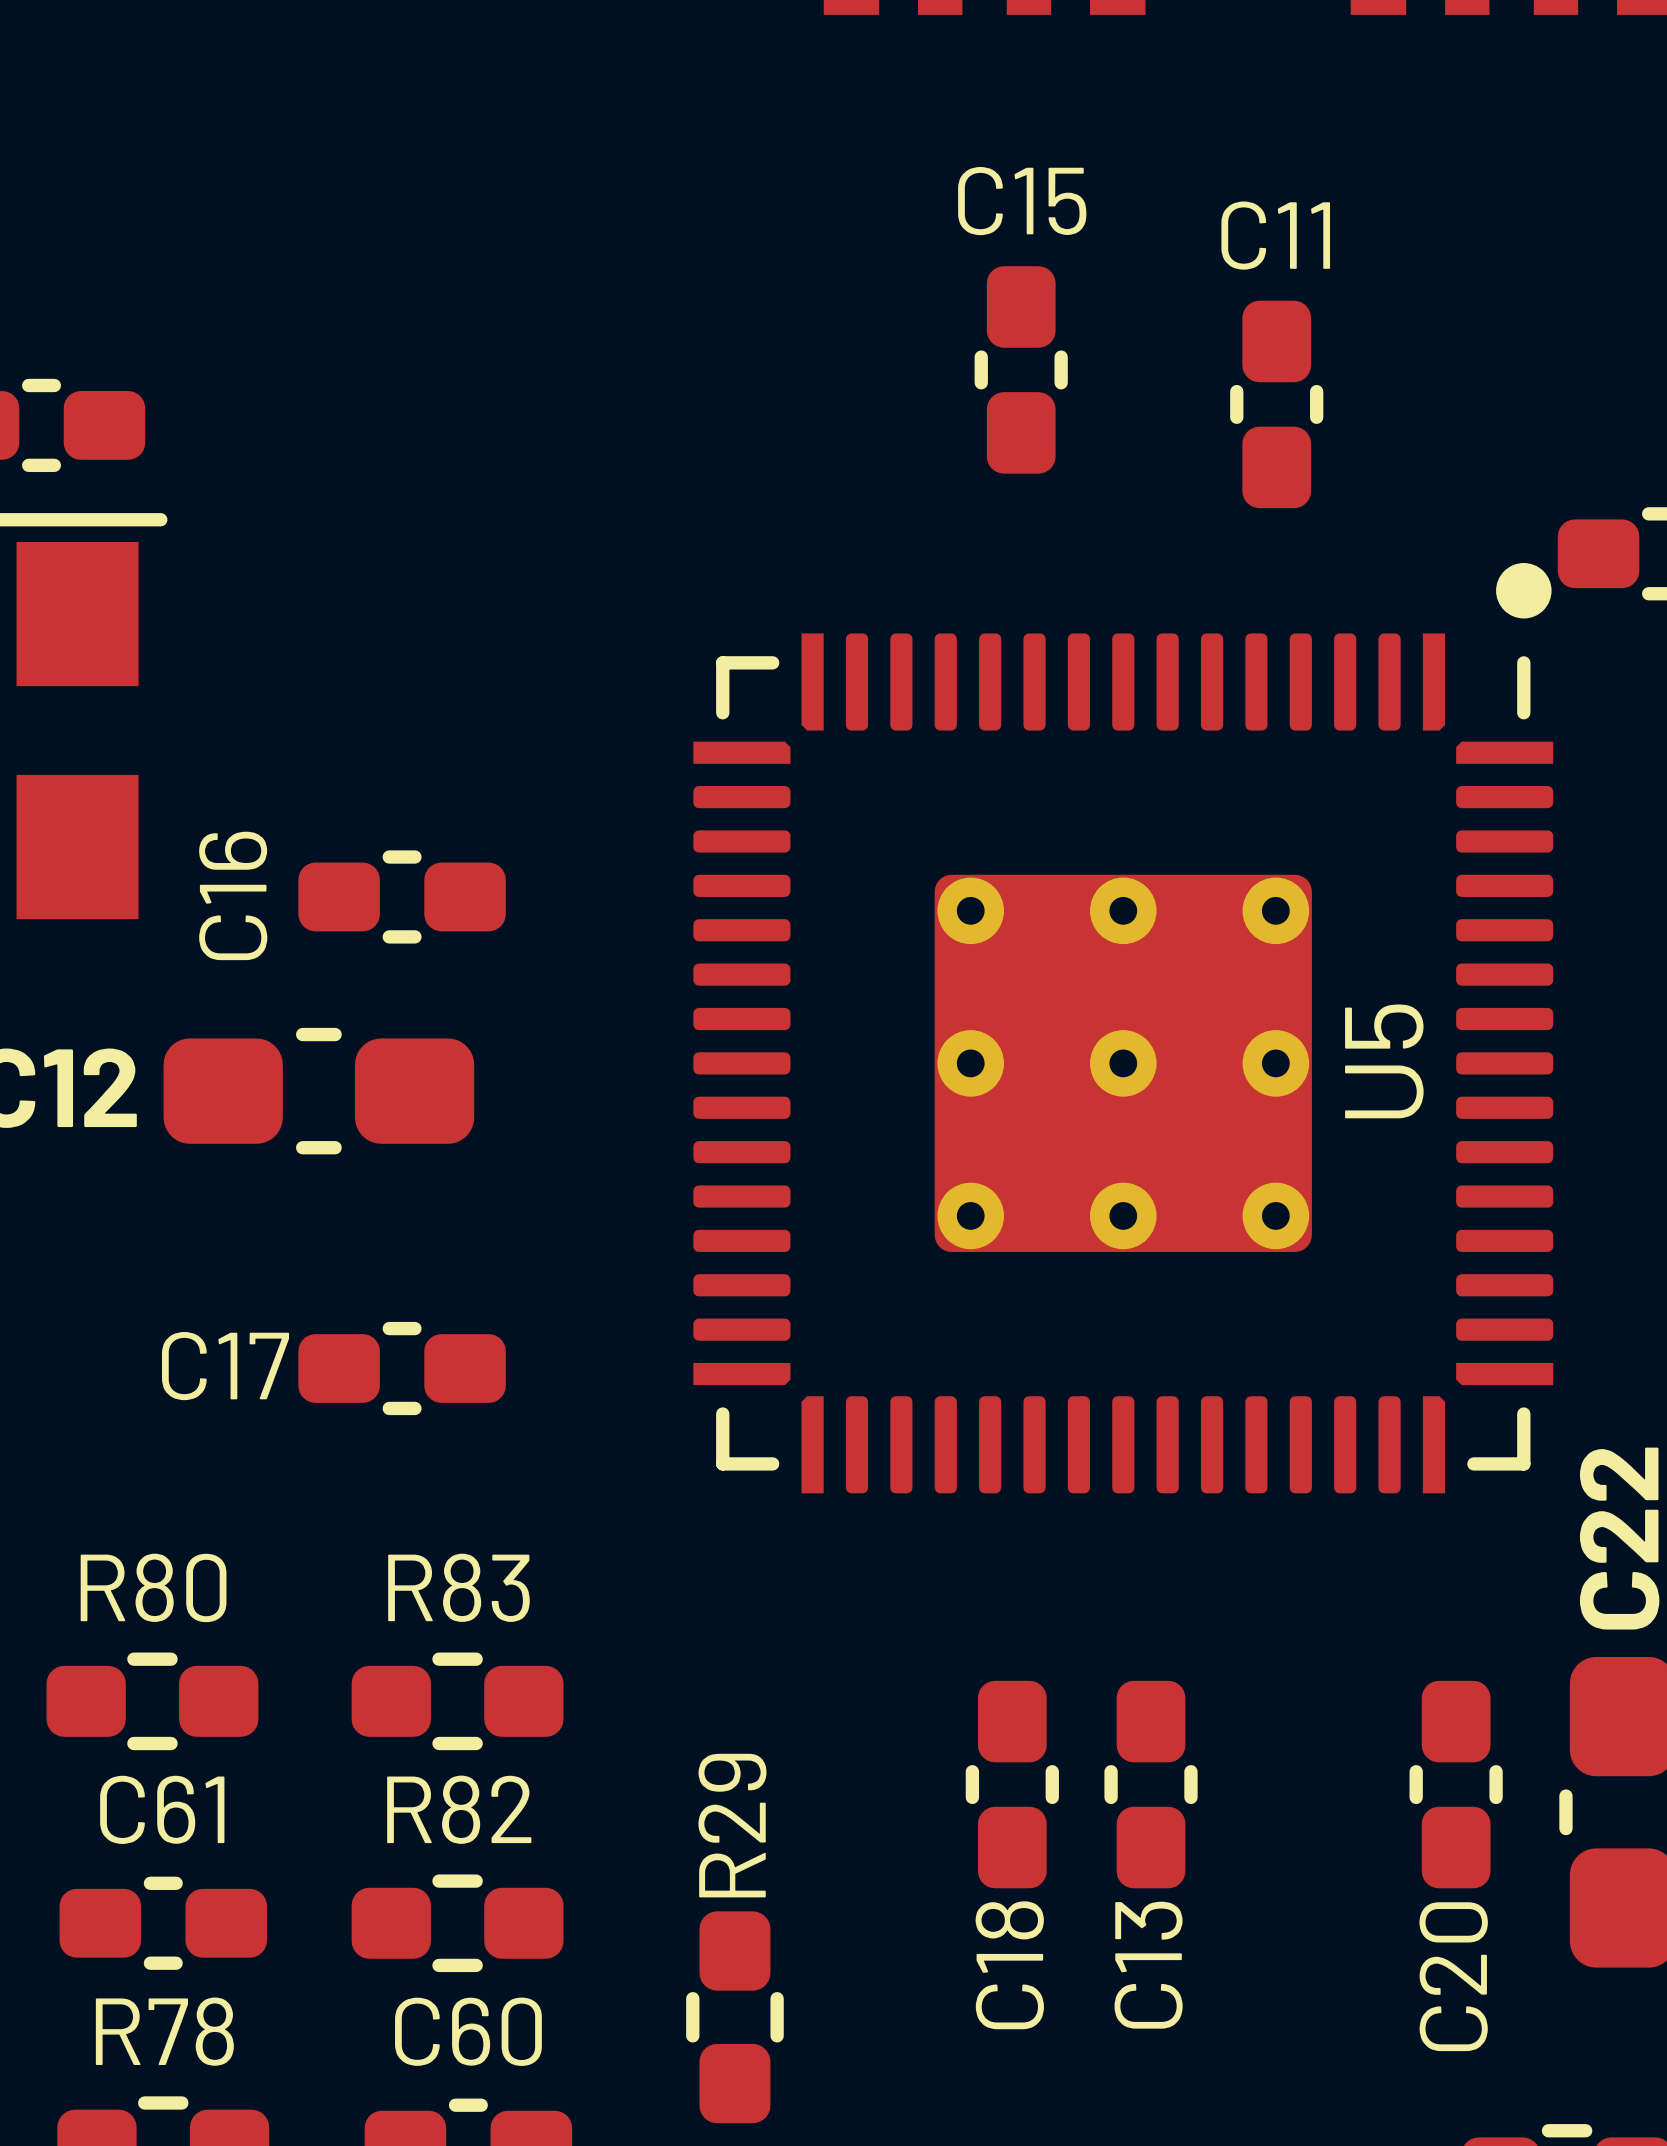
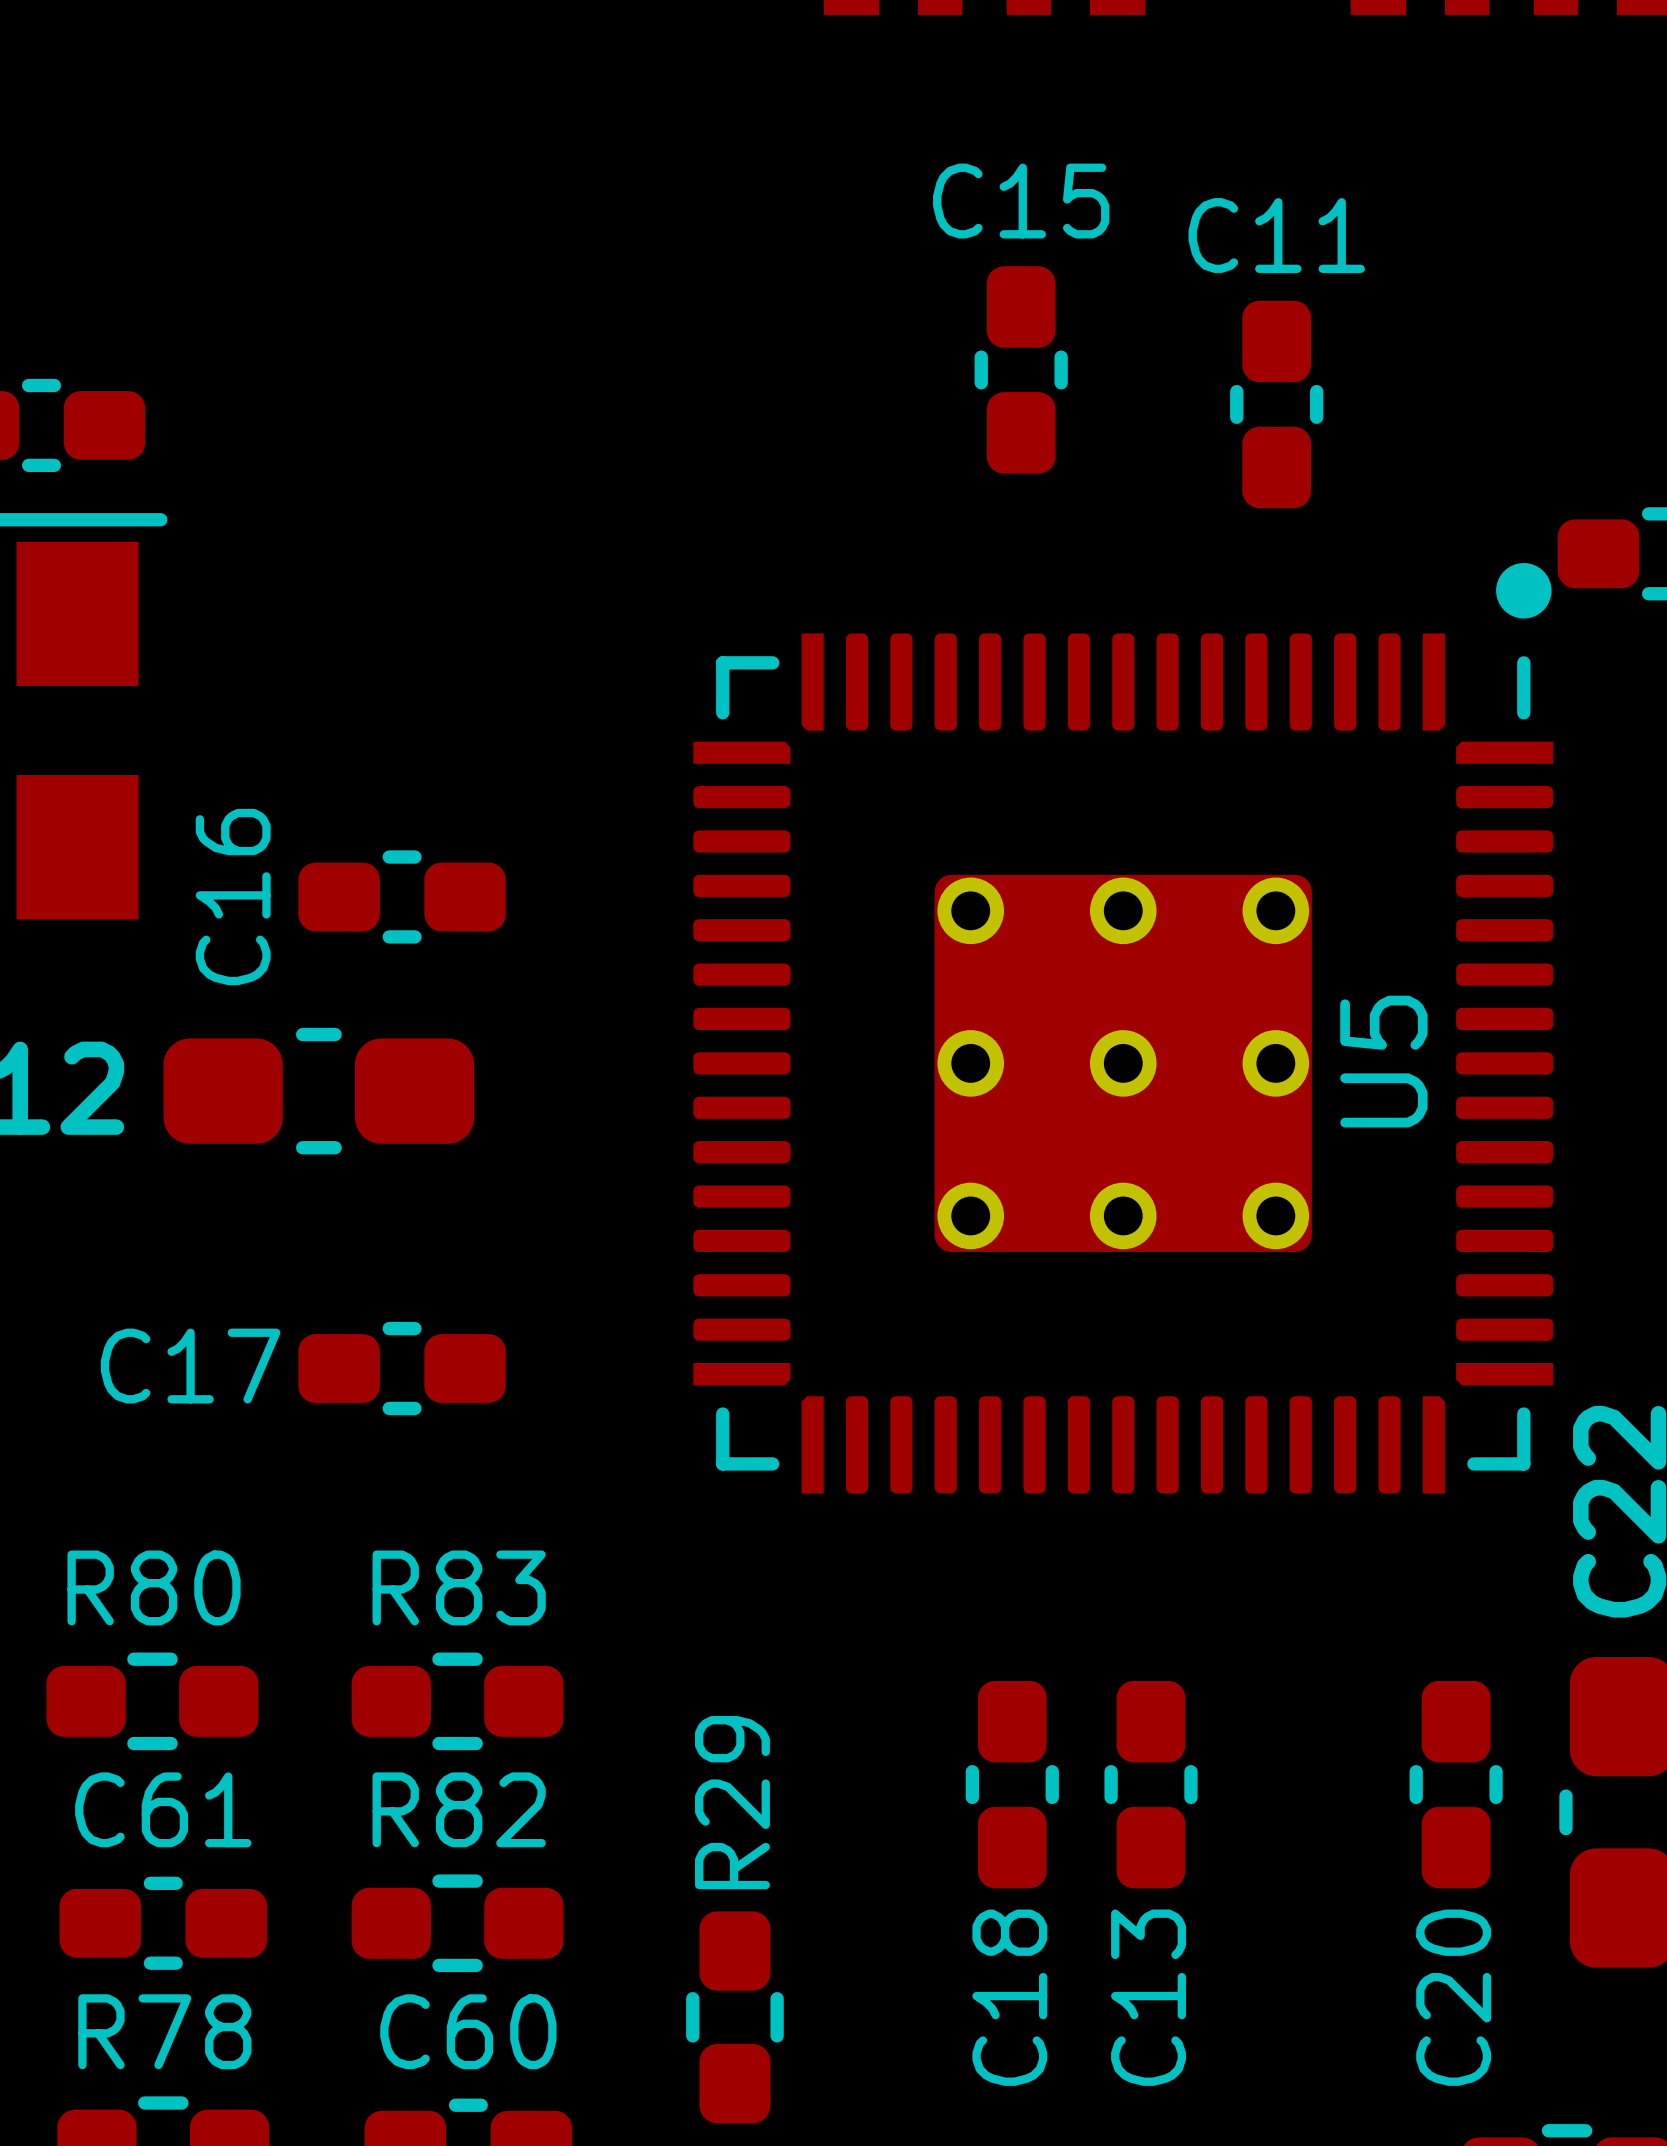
U5 footprint: [693, 563, 1554, 1494] -> [693, 563, 1554, 1494]

